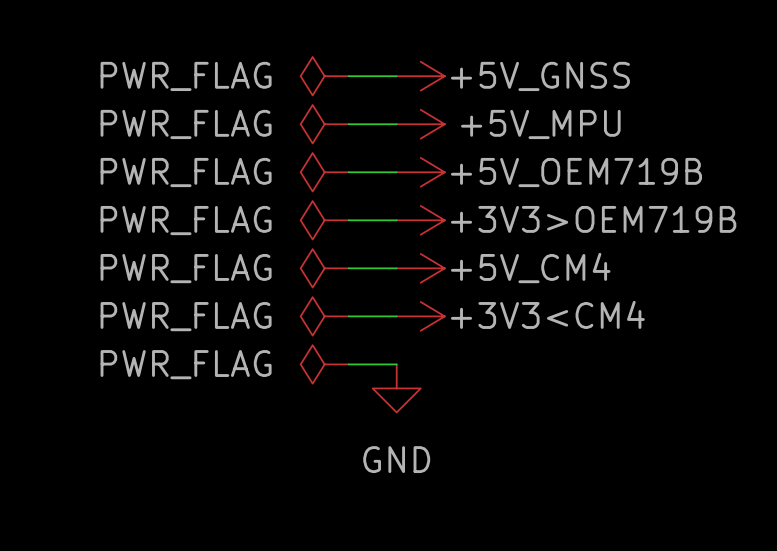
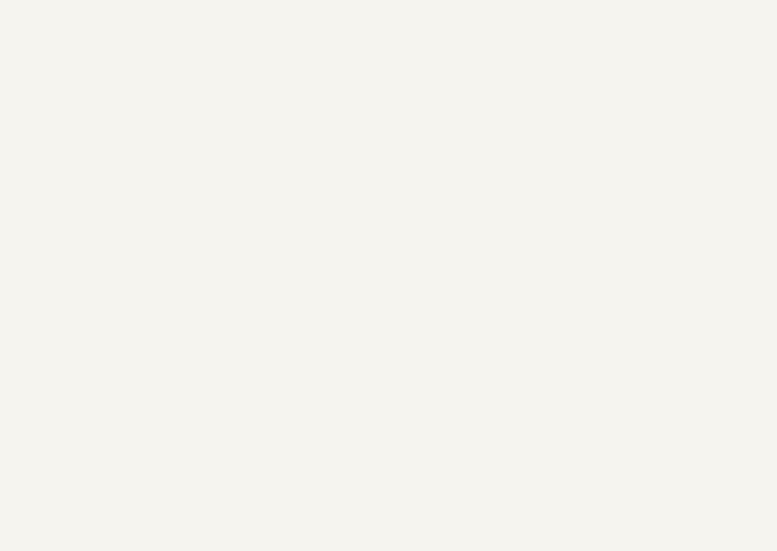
power symbol: PWR_FLAG (324, 76) -> none
wire: (348, 76) (396, 76) -> none
power symbol: +5V_GNSS (420, 76) -> none
power symbol: PWR_FLAG (324, 124) -> none
wire: (348, 124) (396, 124) -> none
power symbol: +5V_MPU (420, 124) -> none
power symbol: PWR_FLAG (324, 172) -> none
wire: (348, 172) (396, 172) -> none
power symbol: +5V_OEM719B (420, 172) -> none
power symbol: PWR_FLAG (324, 220) -> none
wire: (348, 220) (396, 220) -> none
power symbol: +3V3>OEM719B (420, 220) -> none
power symbol: PWR_FLAG (324, 268) -> none
wire: (348, 268) (396, 268) -> none
power symbol: +5V_CM4 (420, 268) -> none
power symbol: PWR_FLAG (324, 316) -> none
wire: (348, 316) (396, 316) -> none
power symbol: +3V3<CM4 (420, 316) -> none
power symbol: PWR_FLAG (324, 364) -> none
wire: (348, 364) (396, 364) -> none
power symbol: GND (396, 388) -> none

